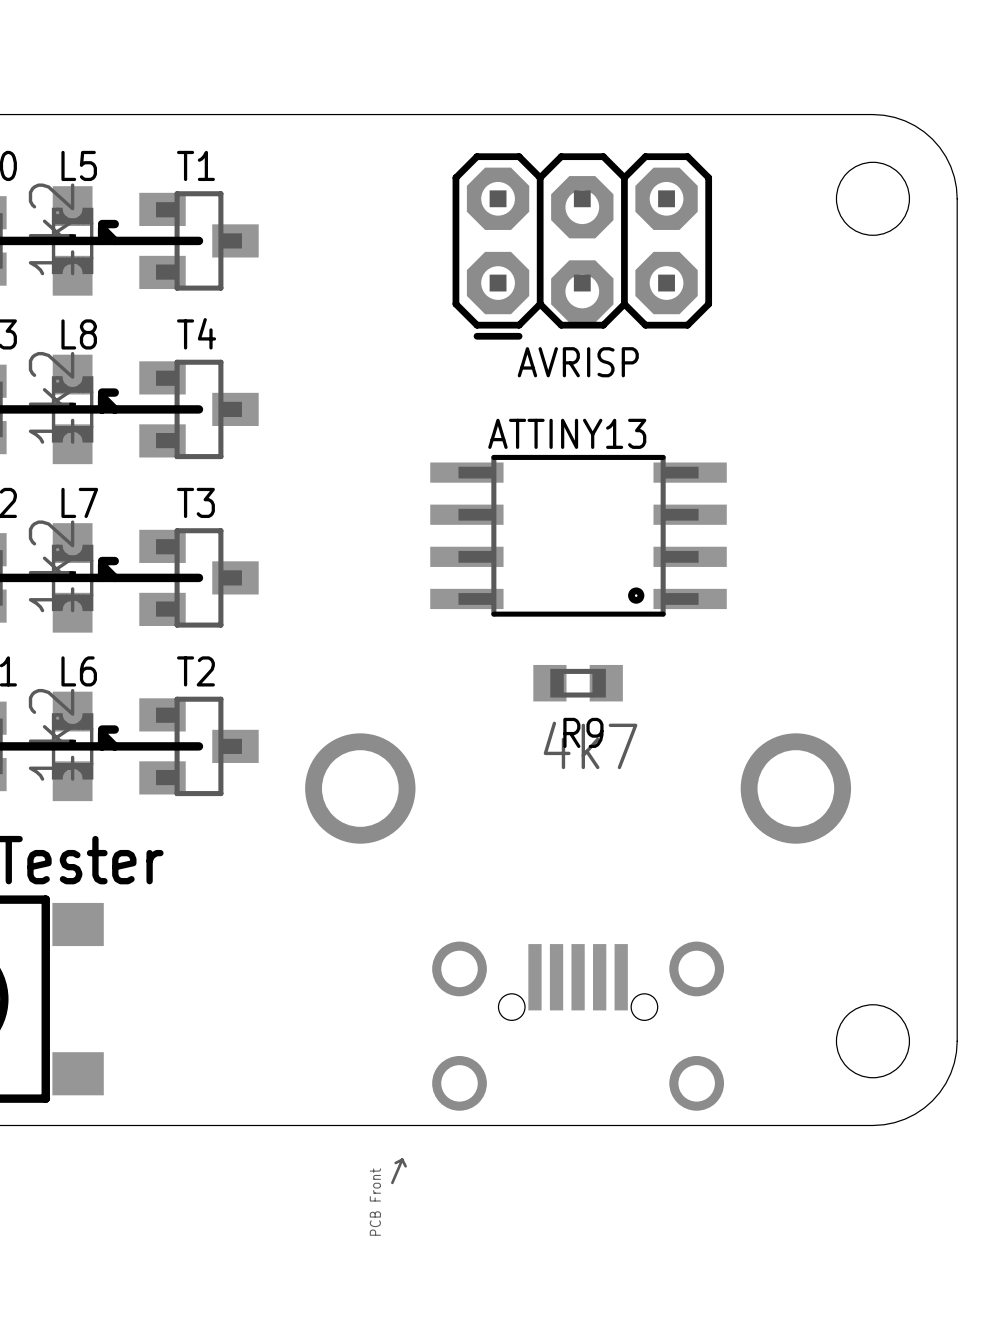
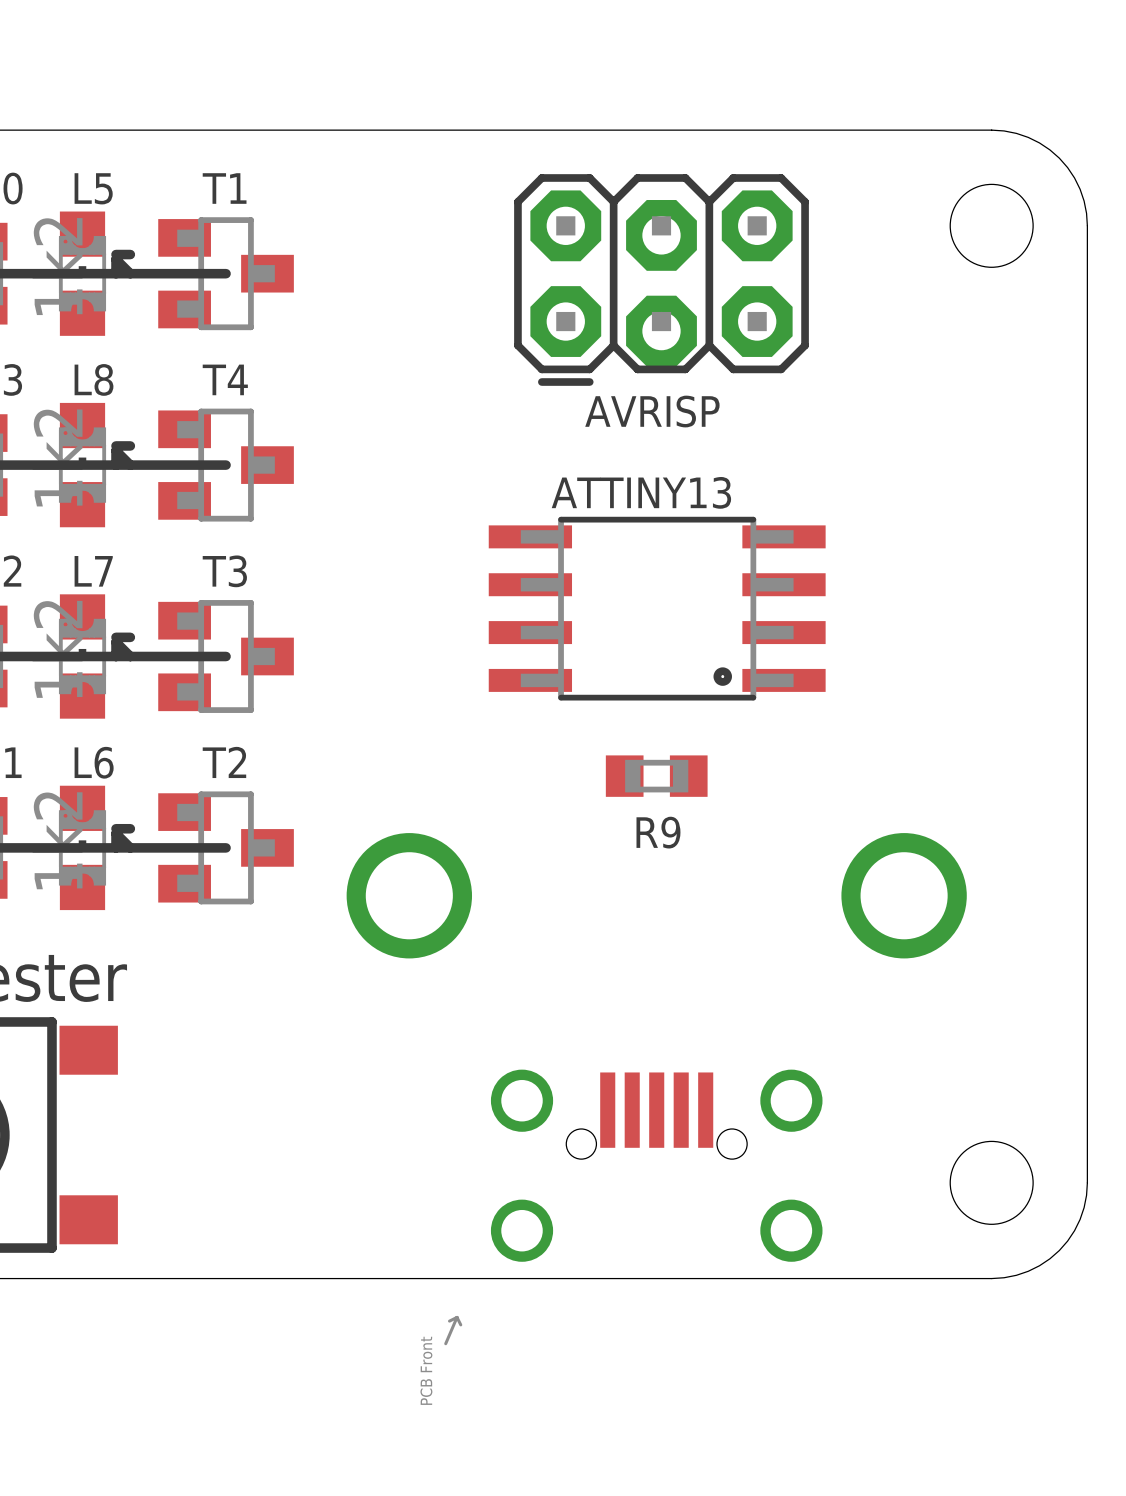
R9 value: 4k7 (590, 745) -> none

